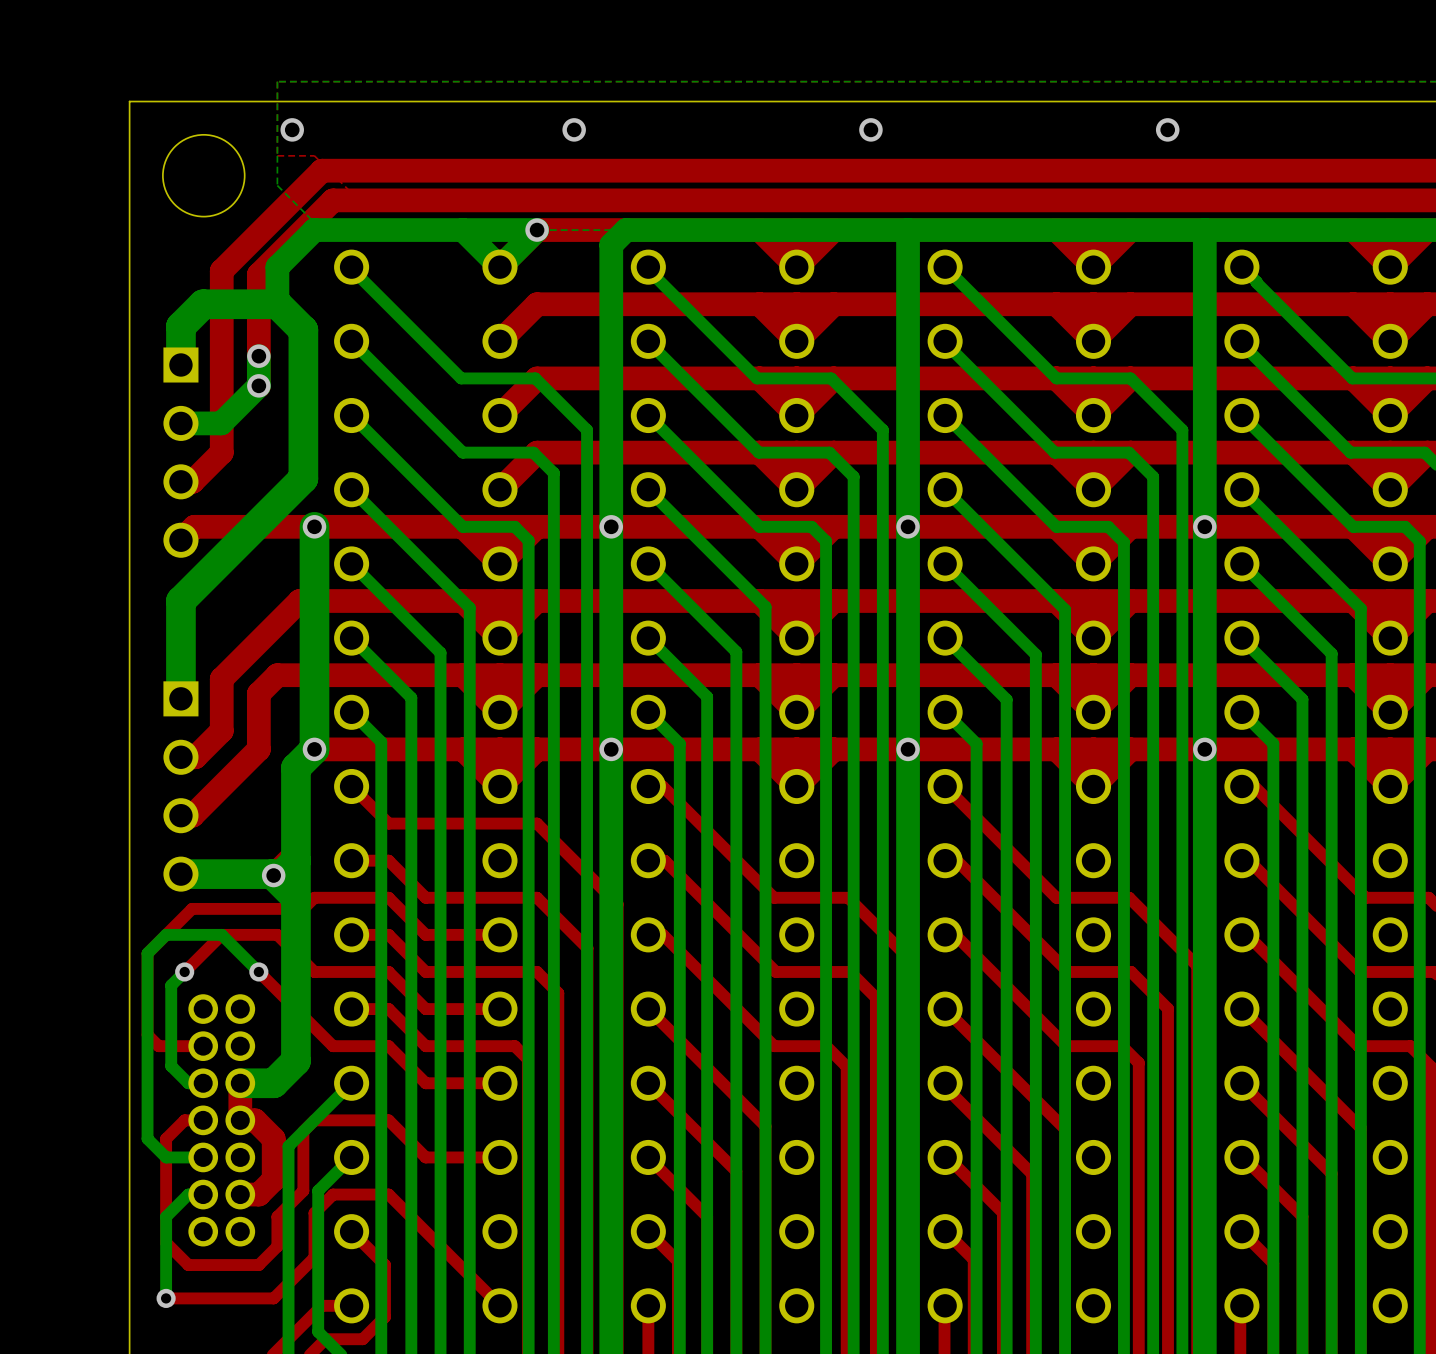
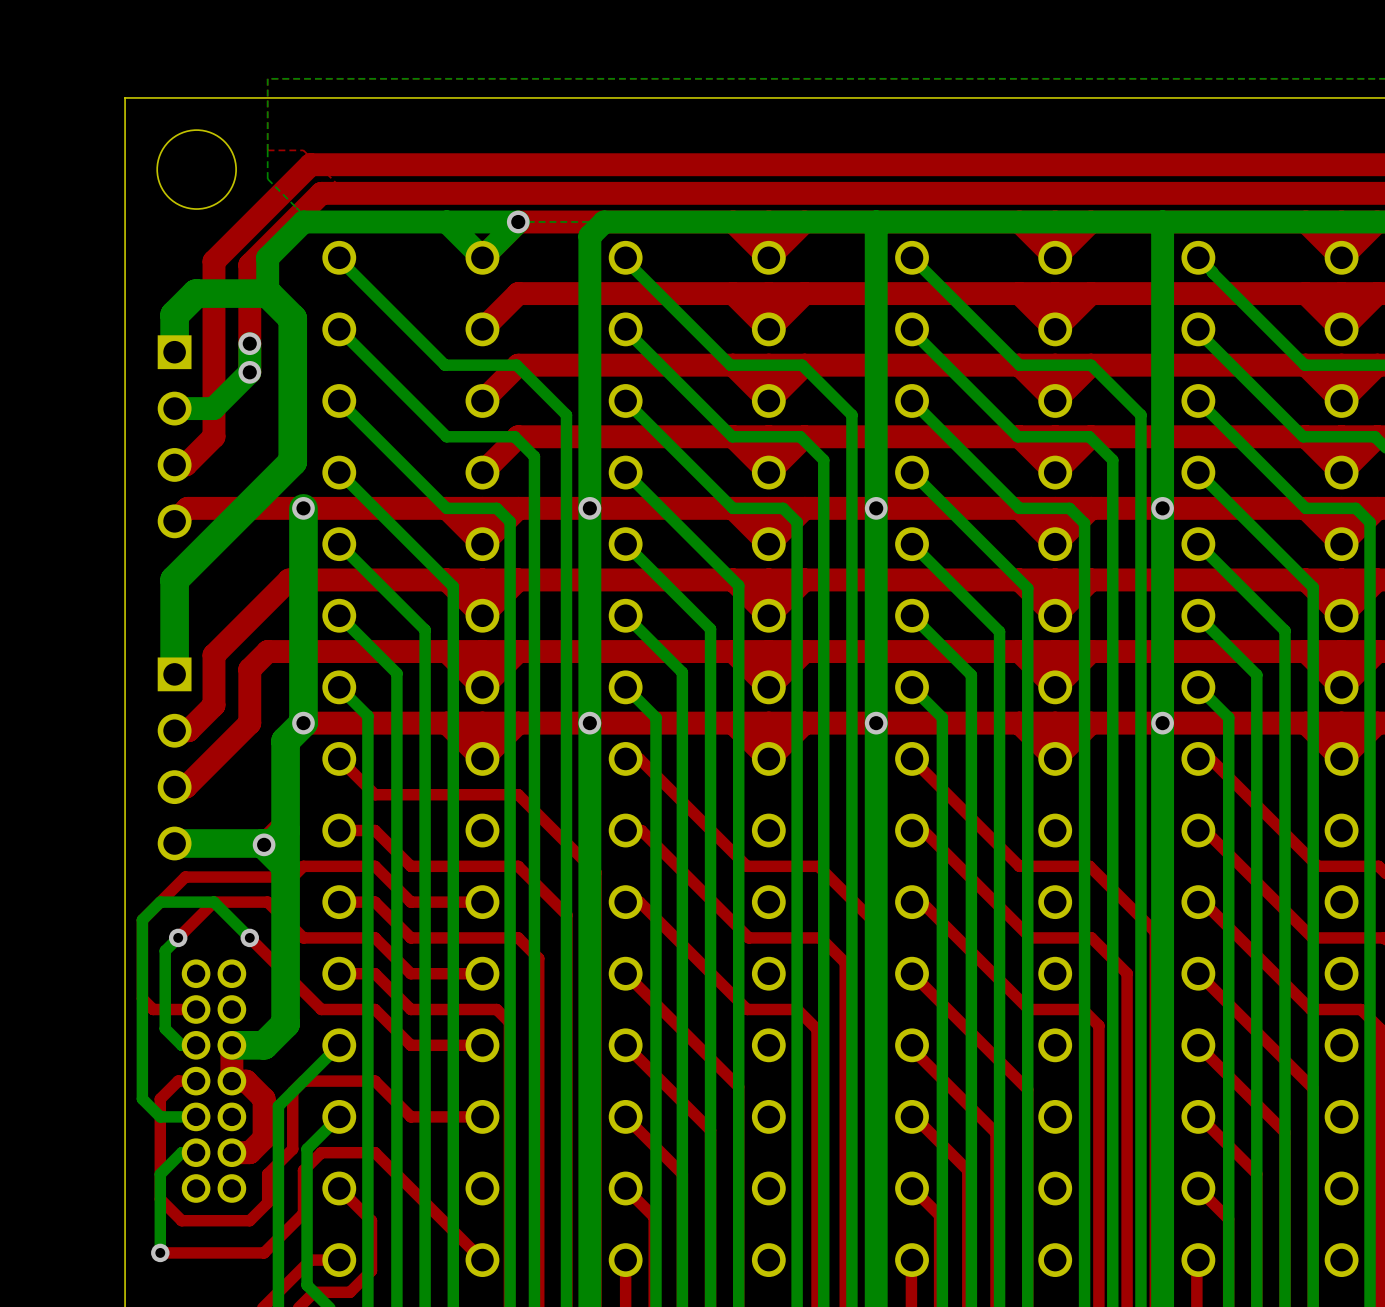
via: (292, 129) -> none
via: (574, 129) -> none
via: (870, 129) -> none
via: (1167, 129) -> none

